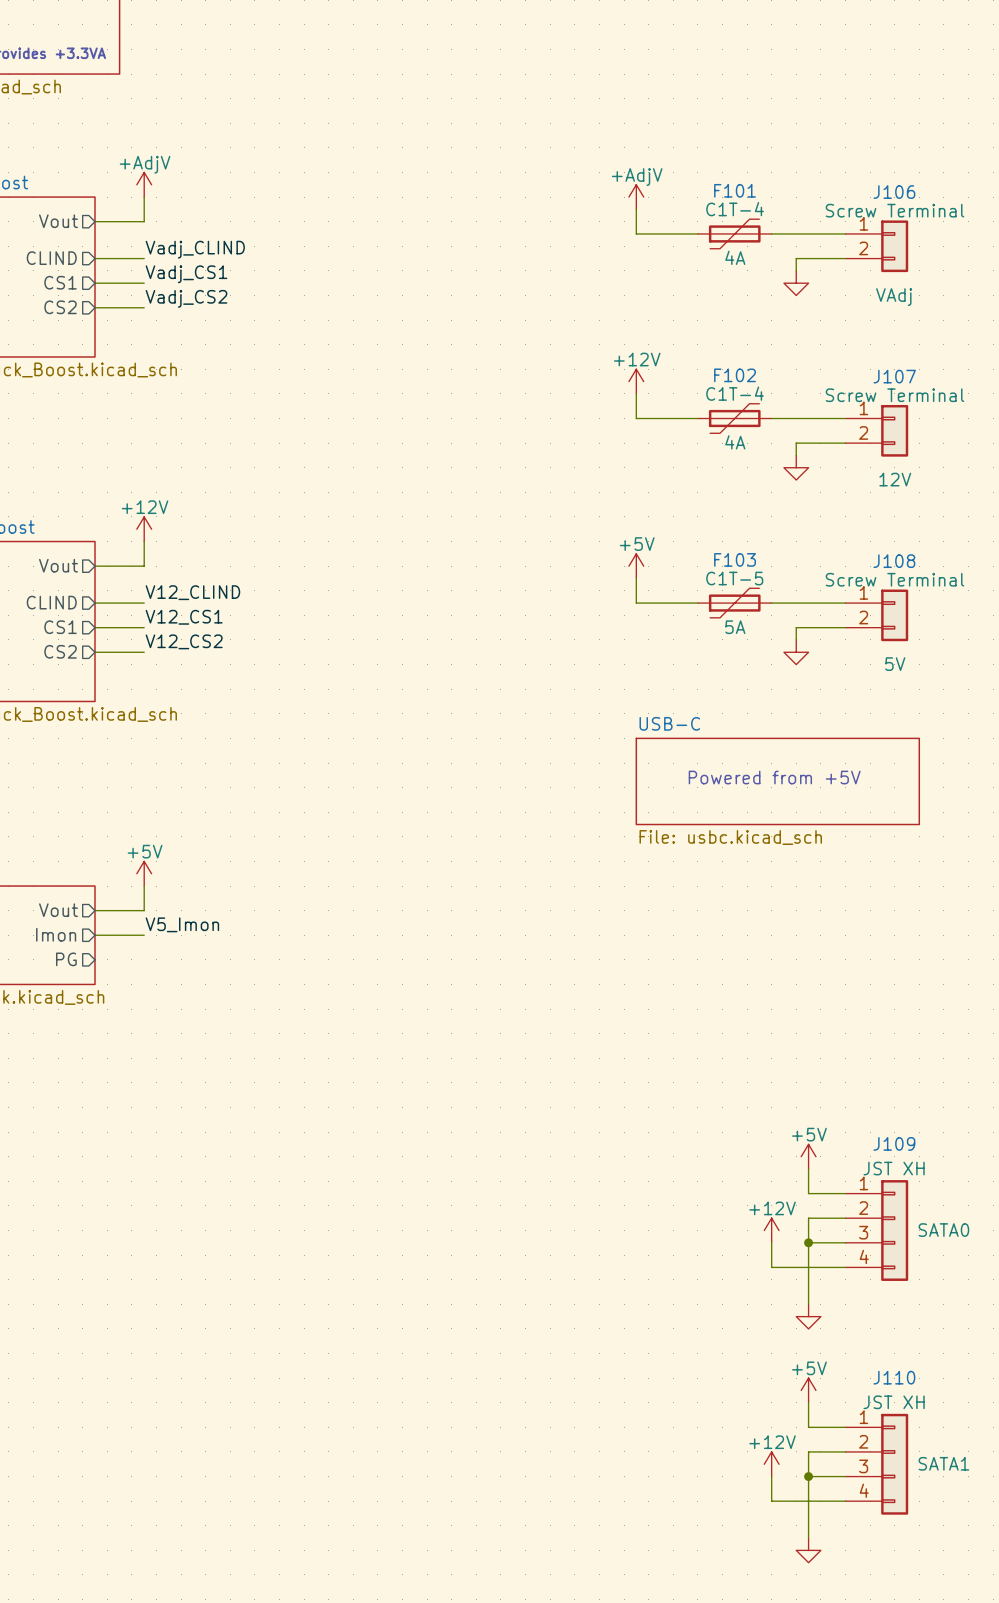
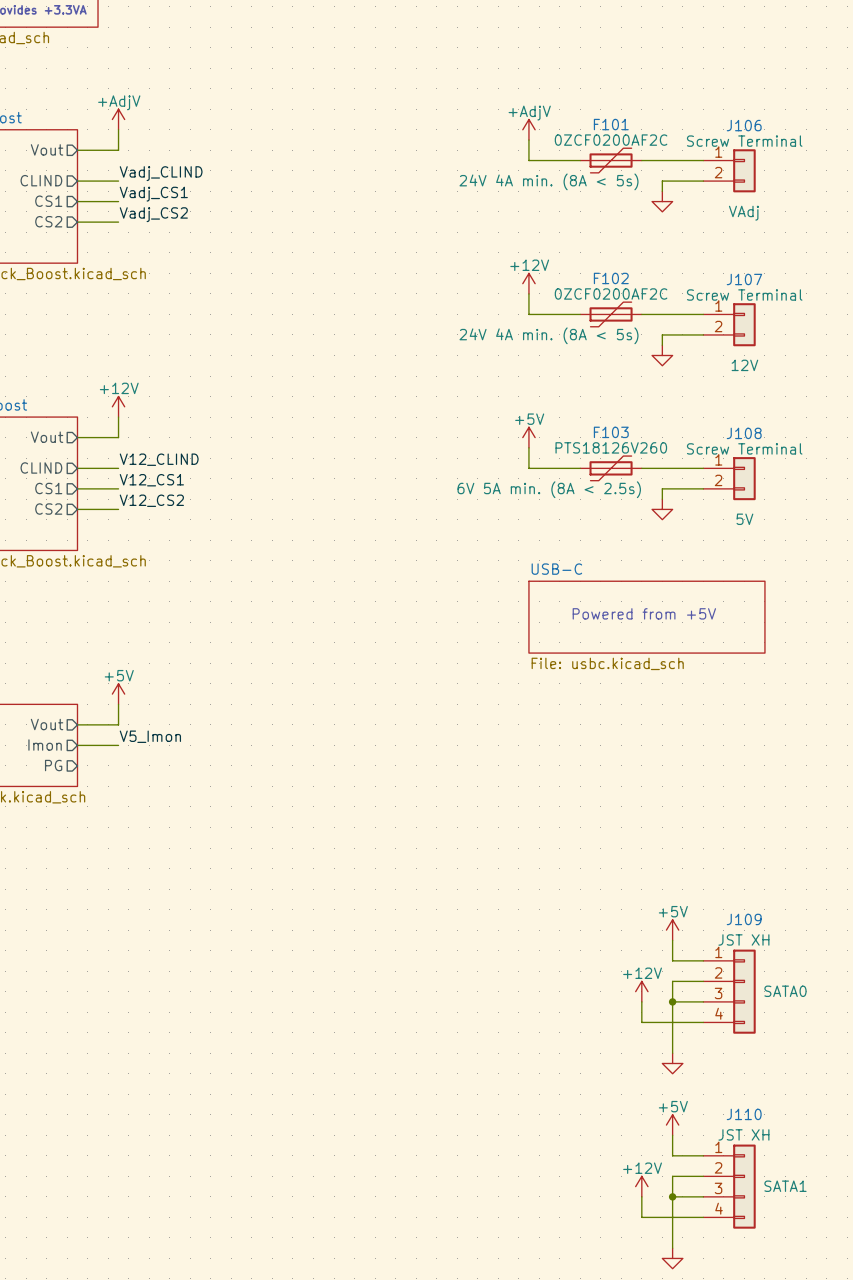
F101 value: C1T-4 (735, 209) -> 0ZCF0200AF2C (611, 140)
F101 text: 4A (735, 257) -> 24V 4A min. (8A < 5s) (548, 181)
F102 value: C1T-4 (735, 393) -> 0ZCF0200AF2C (611, 293)
F102 text: 4A (735, 442) -> 24V 4A min. (8A < 5s) (548, 335)
F103 value: C1T-5 (734, 578) -> PTS18126V260 (611, 447)
F103 text: 5A (735, 627) -> 6V 5A min. (8A < 2.5s) (549, 489)

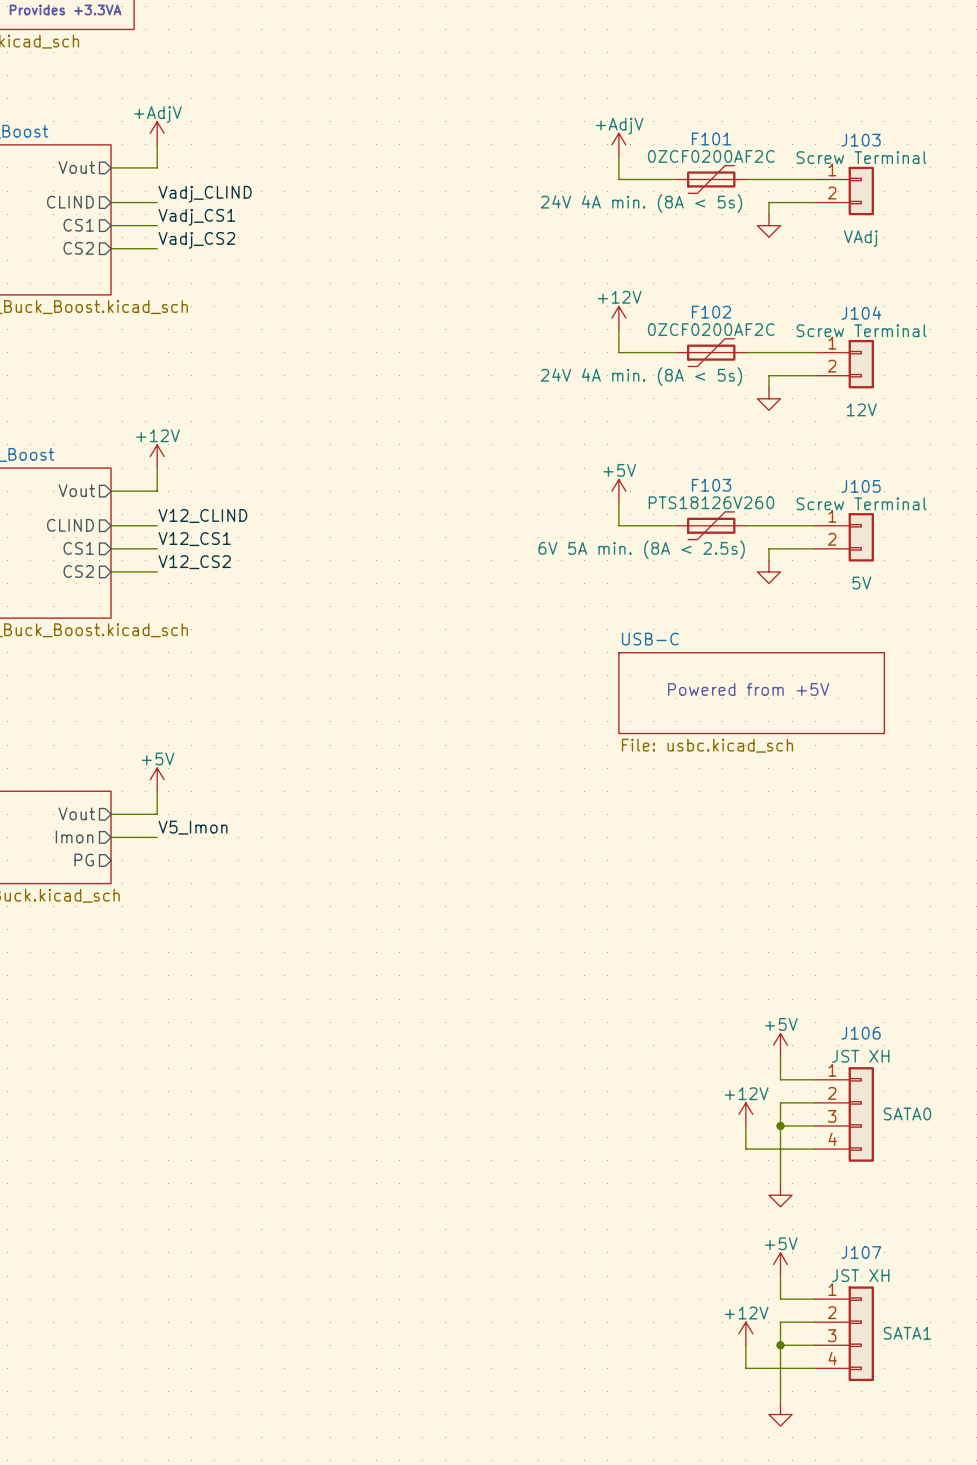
J106 name: J106 (744, 125) -> J103 (861, 140)
J107 name: J107 (744, 279) -> J104 (861, 313)
J108 name: J108 (744, 433) -> J105 (861, 486)
J109 name: J109 (744, 919) -> J106 (861, 1033)
J110 name: J110 (744, 1114) -> J107 (861, 1252)

